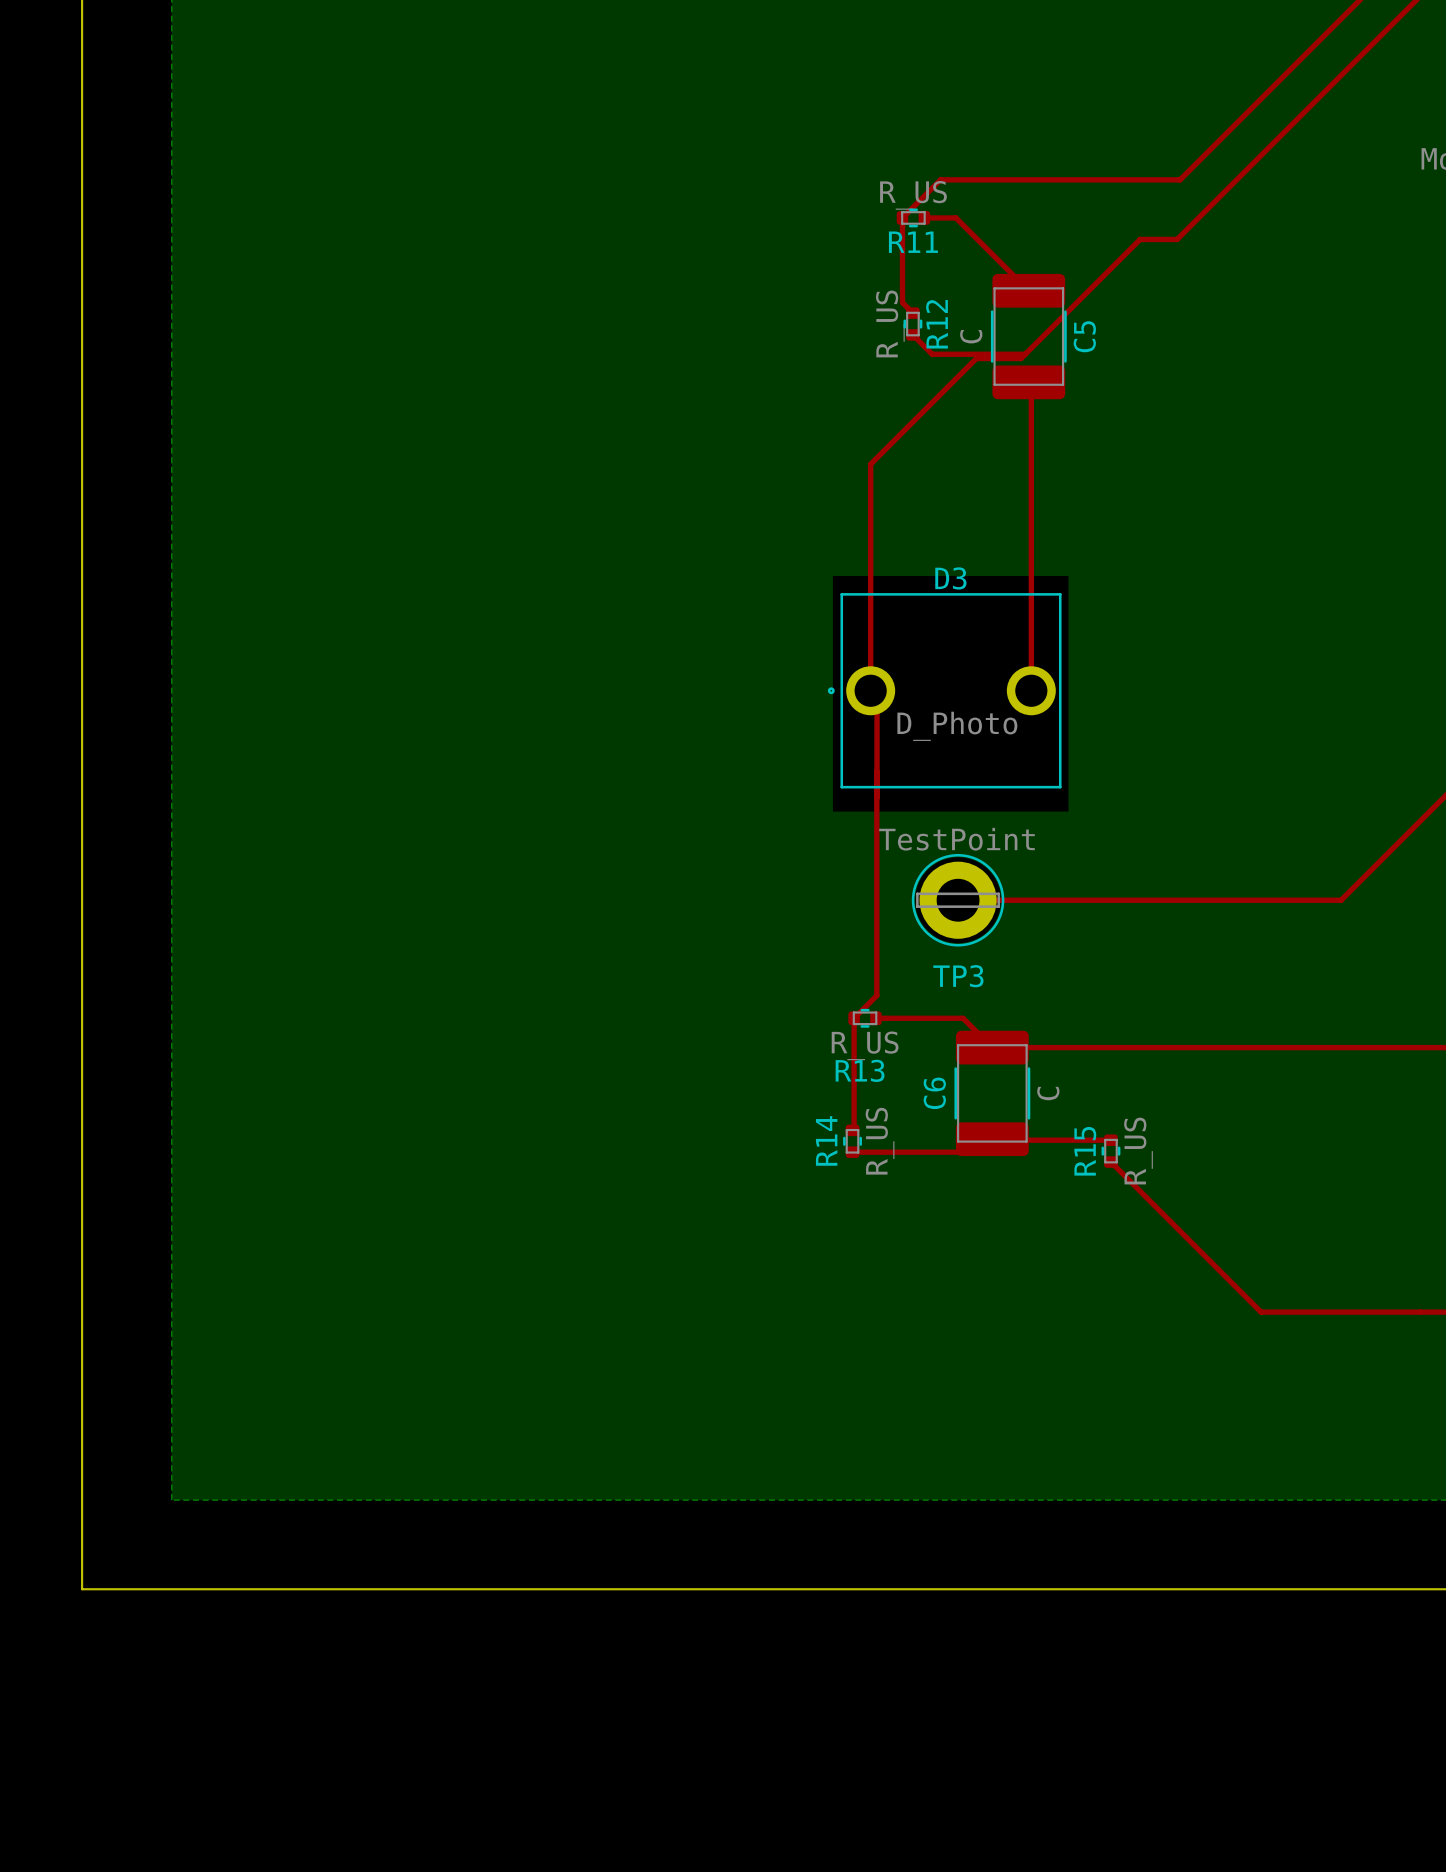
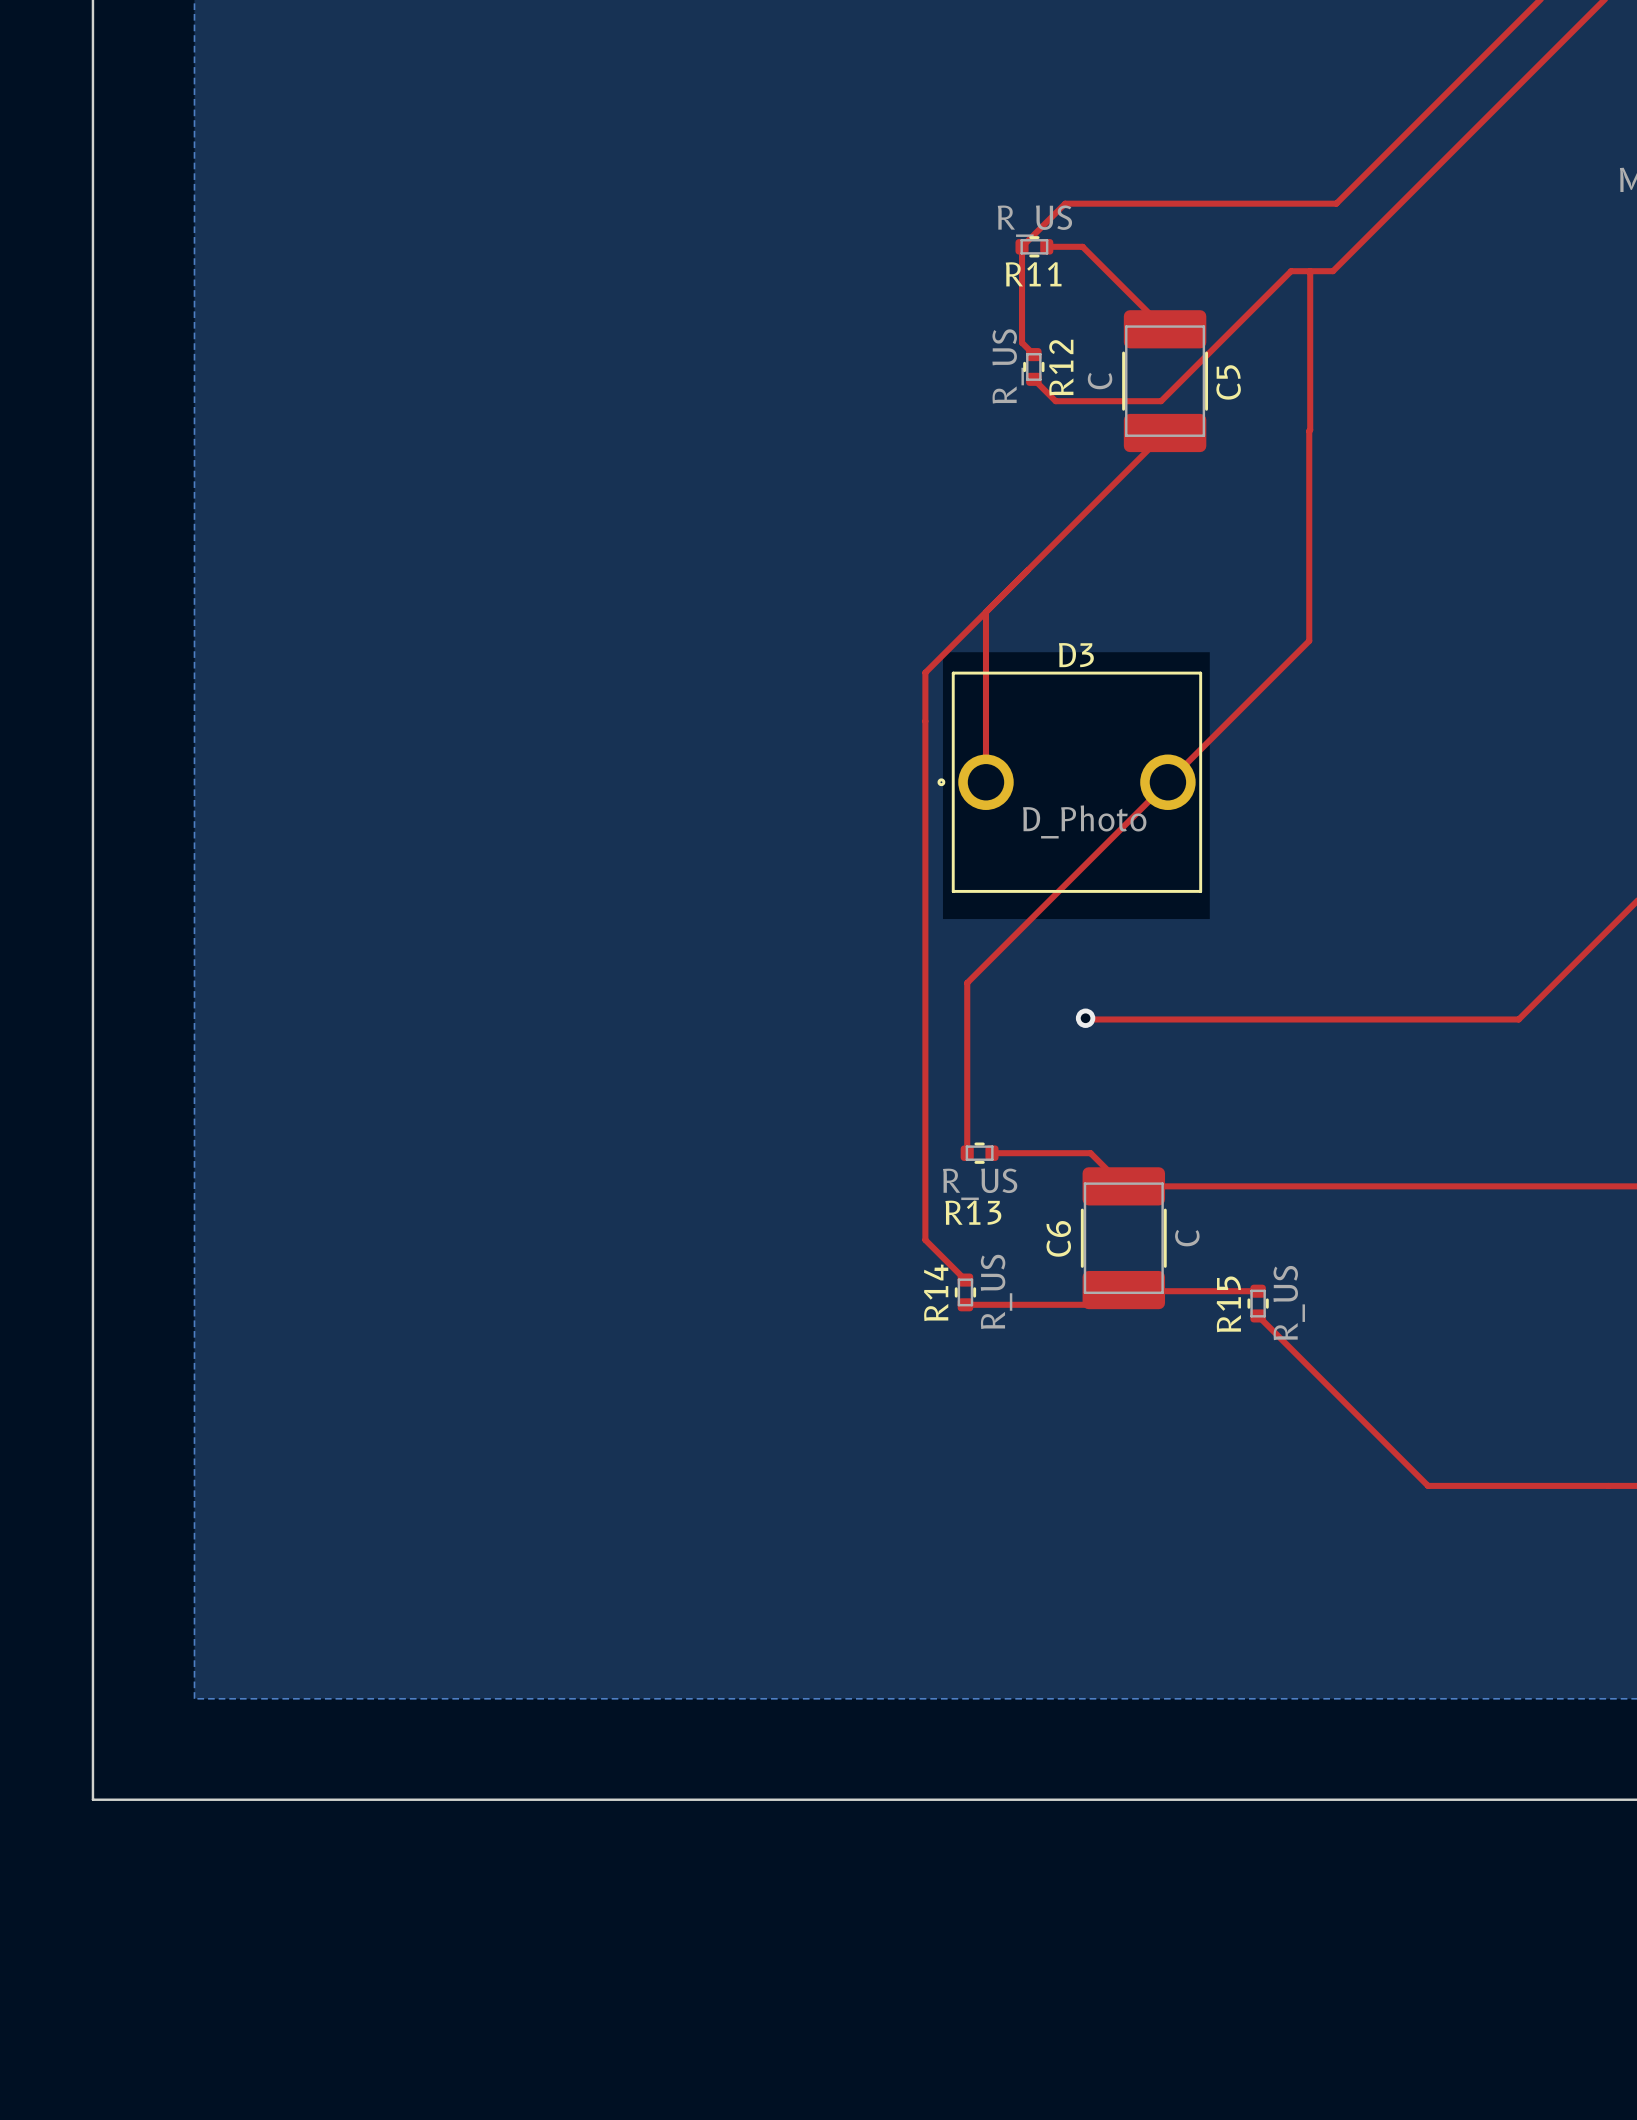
top track: none -> (1310, 271) (1309, 640) (967, 982) (967, 1153)
top track: (1025, 354) (1021, 358) (976, 358) (870, 464) (870, 540) -> none
top track: (1028, 382) (1031, 384) (1031, 690) -> (1165, 432) (925, 672) (925, 1240) (965, 1280)
top track: (877, 697) (877, 797) -> none
top track: (876, 771) (876, 995) (854, 1018) (854, 1128) -> none
via: none -> (1085, 1018)
TP3: TestPoint (958, 900) -> none

